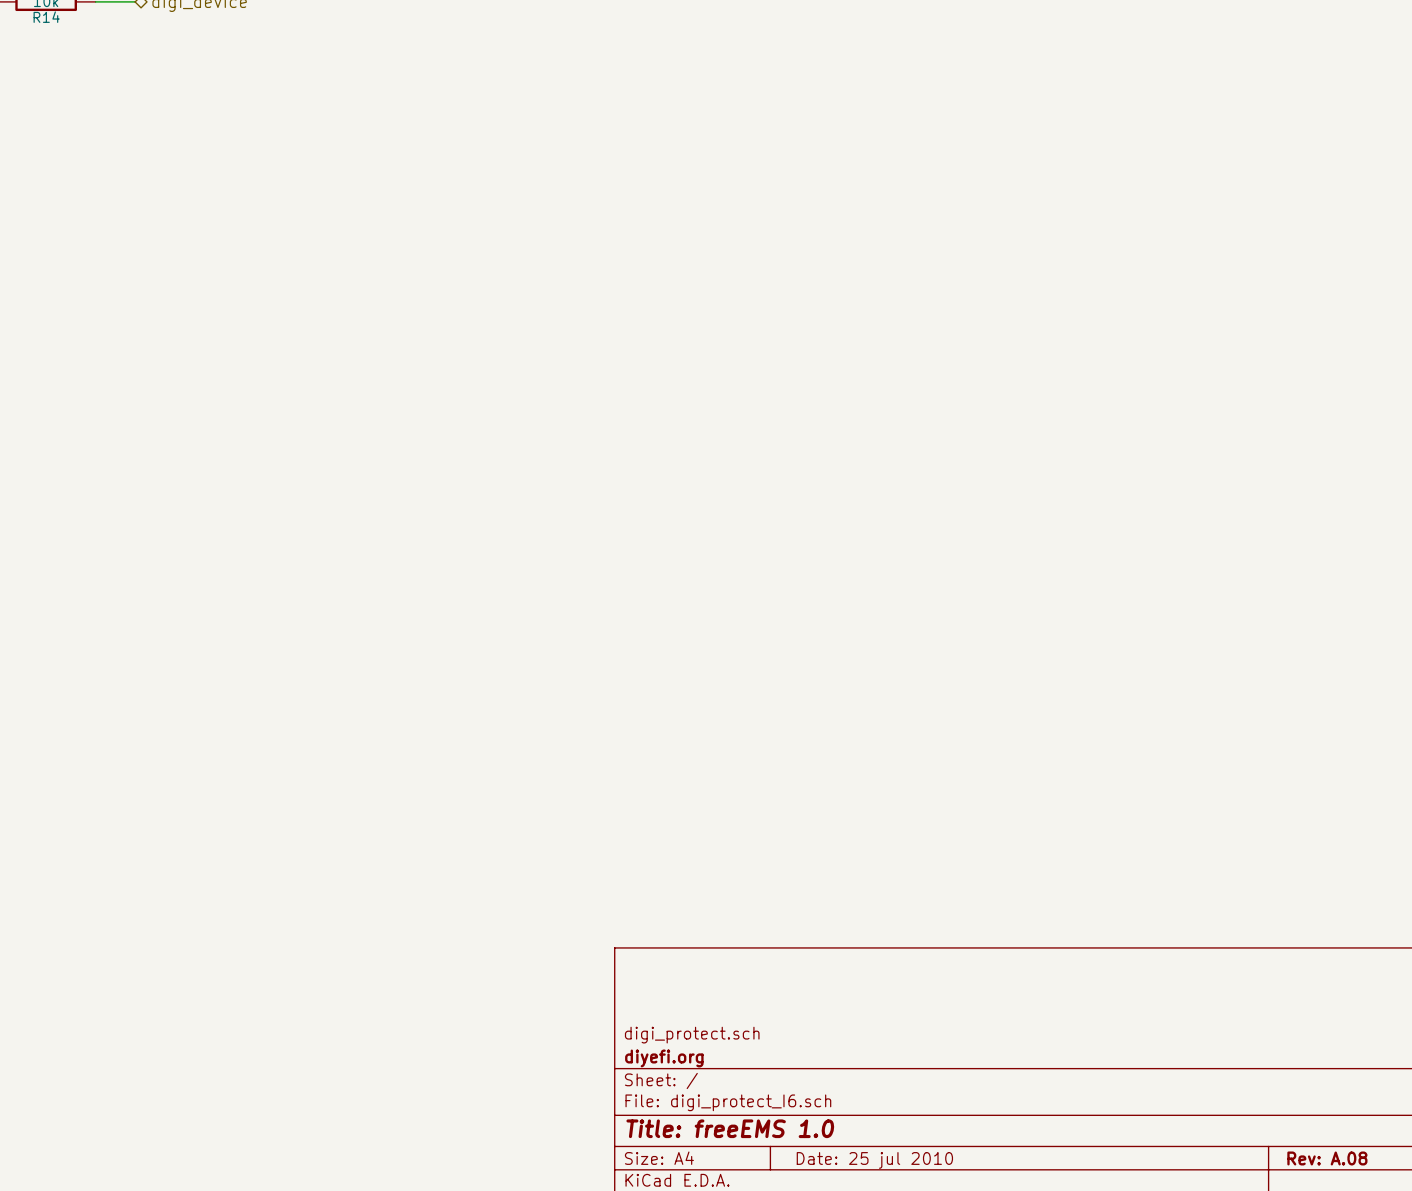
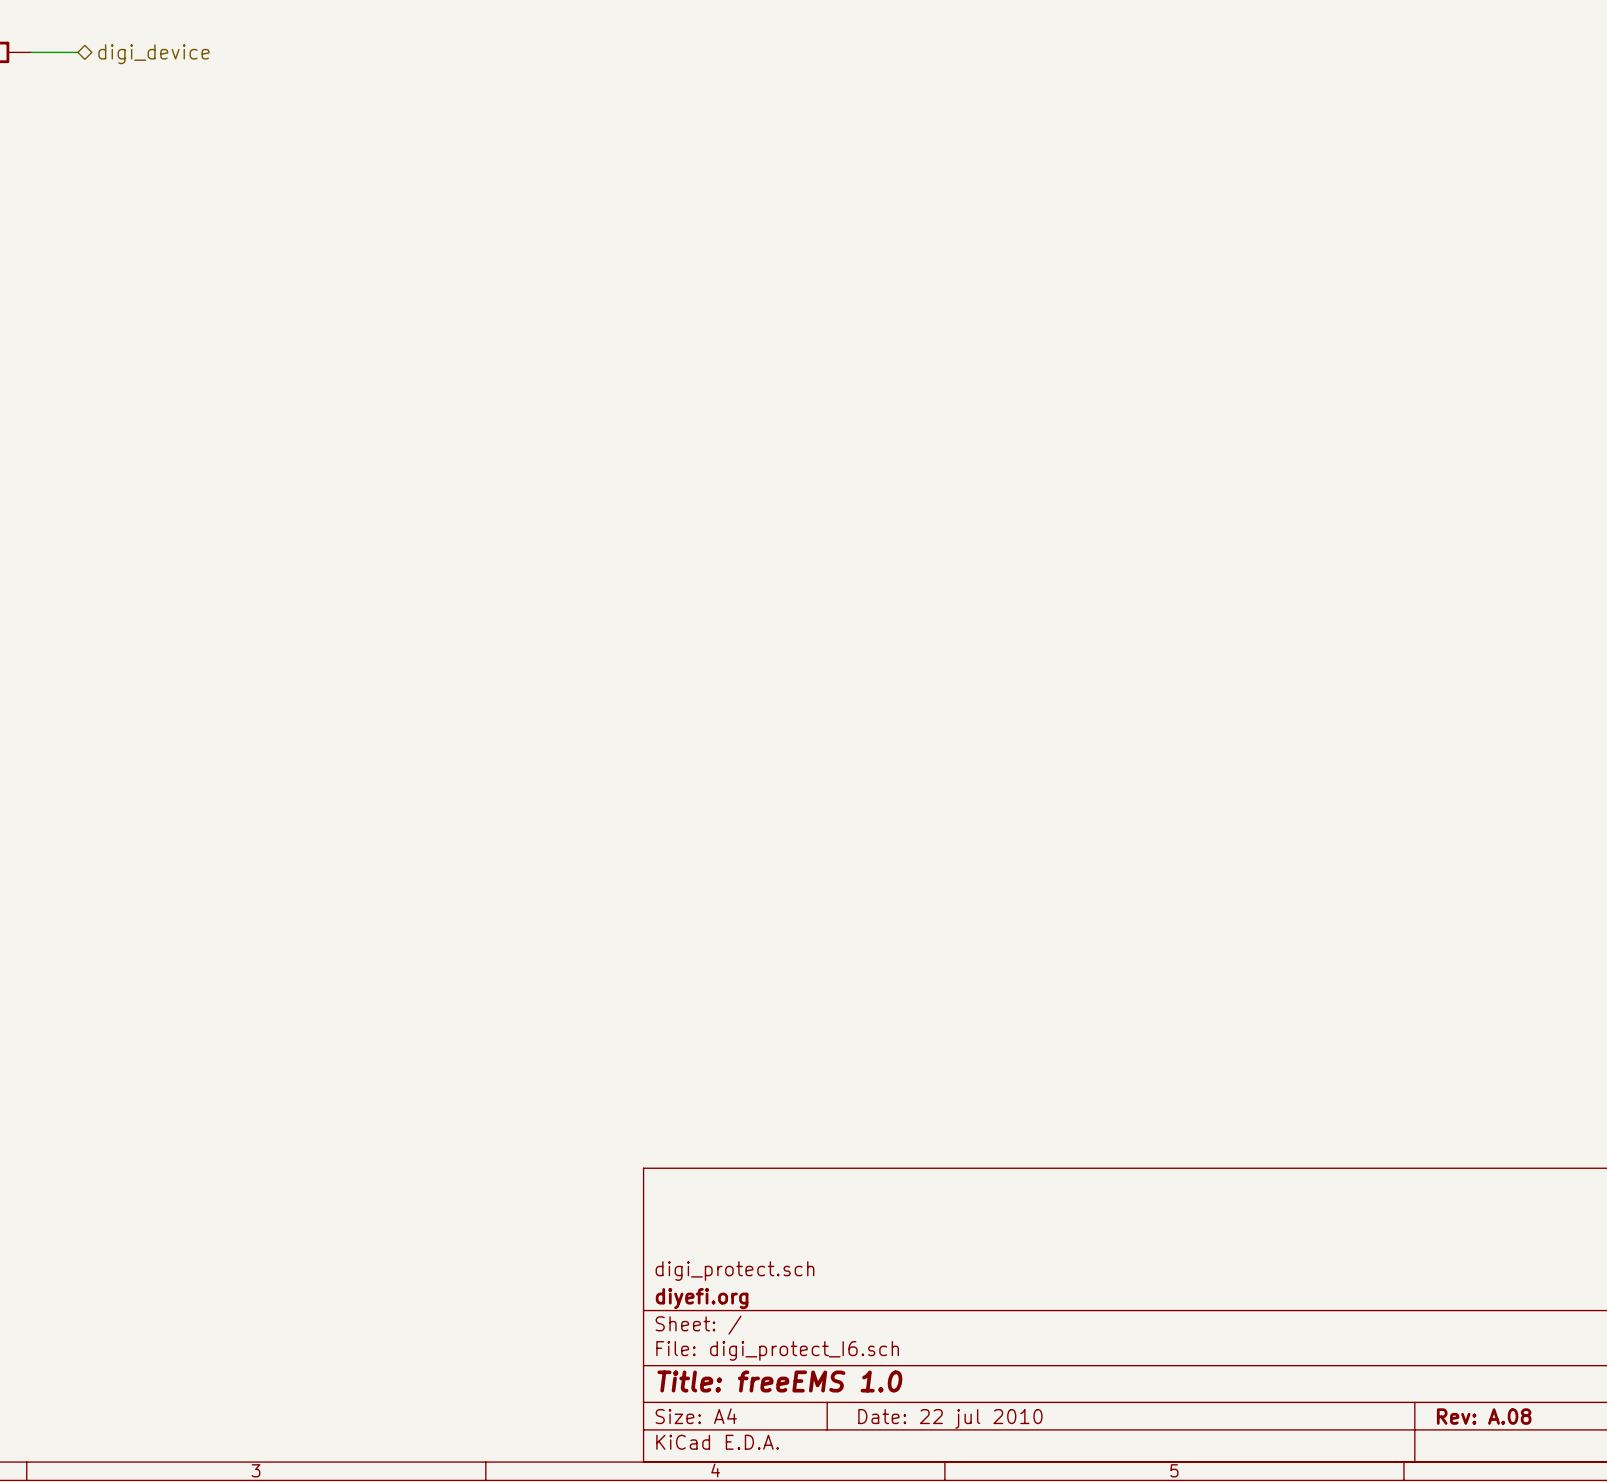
title block: Date: 25 jul 2010 (874, 1160) -> Date: 22 jul 2010 (950, 1418)

